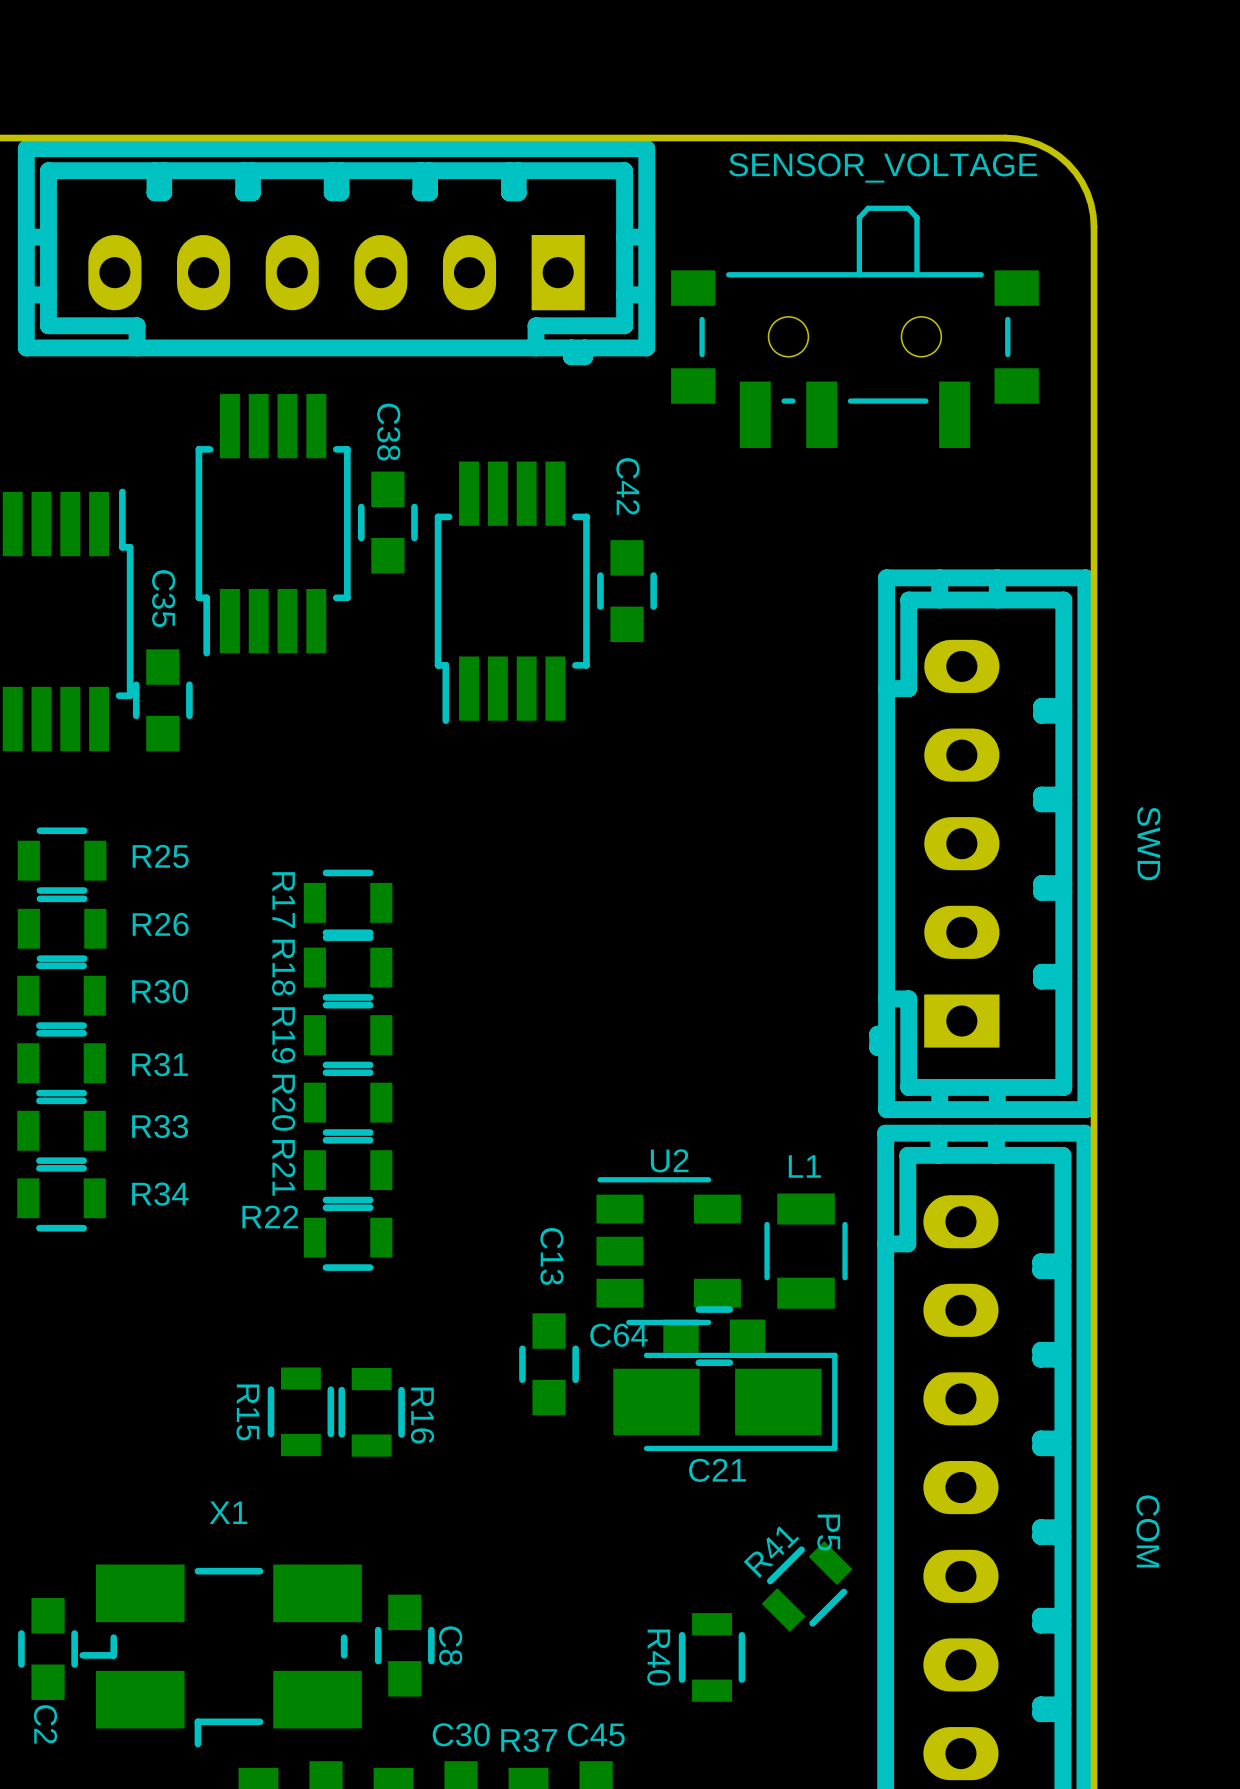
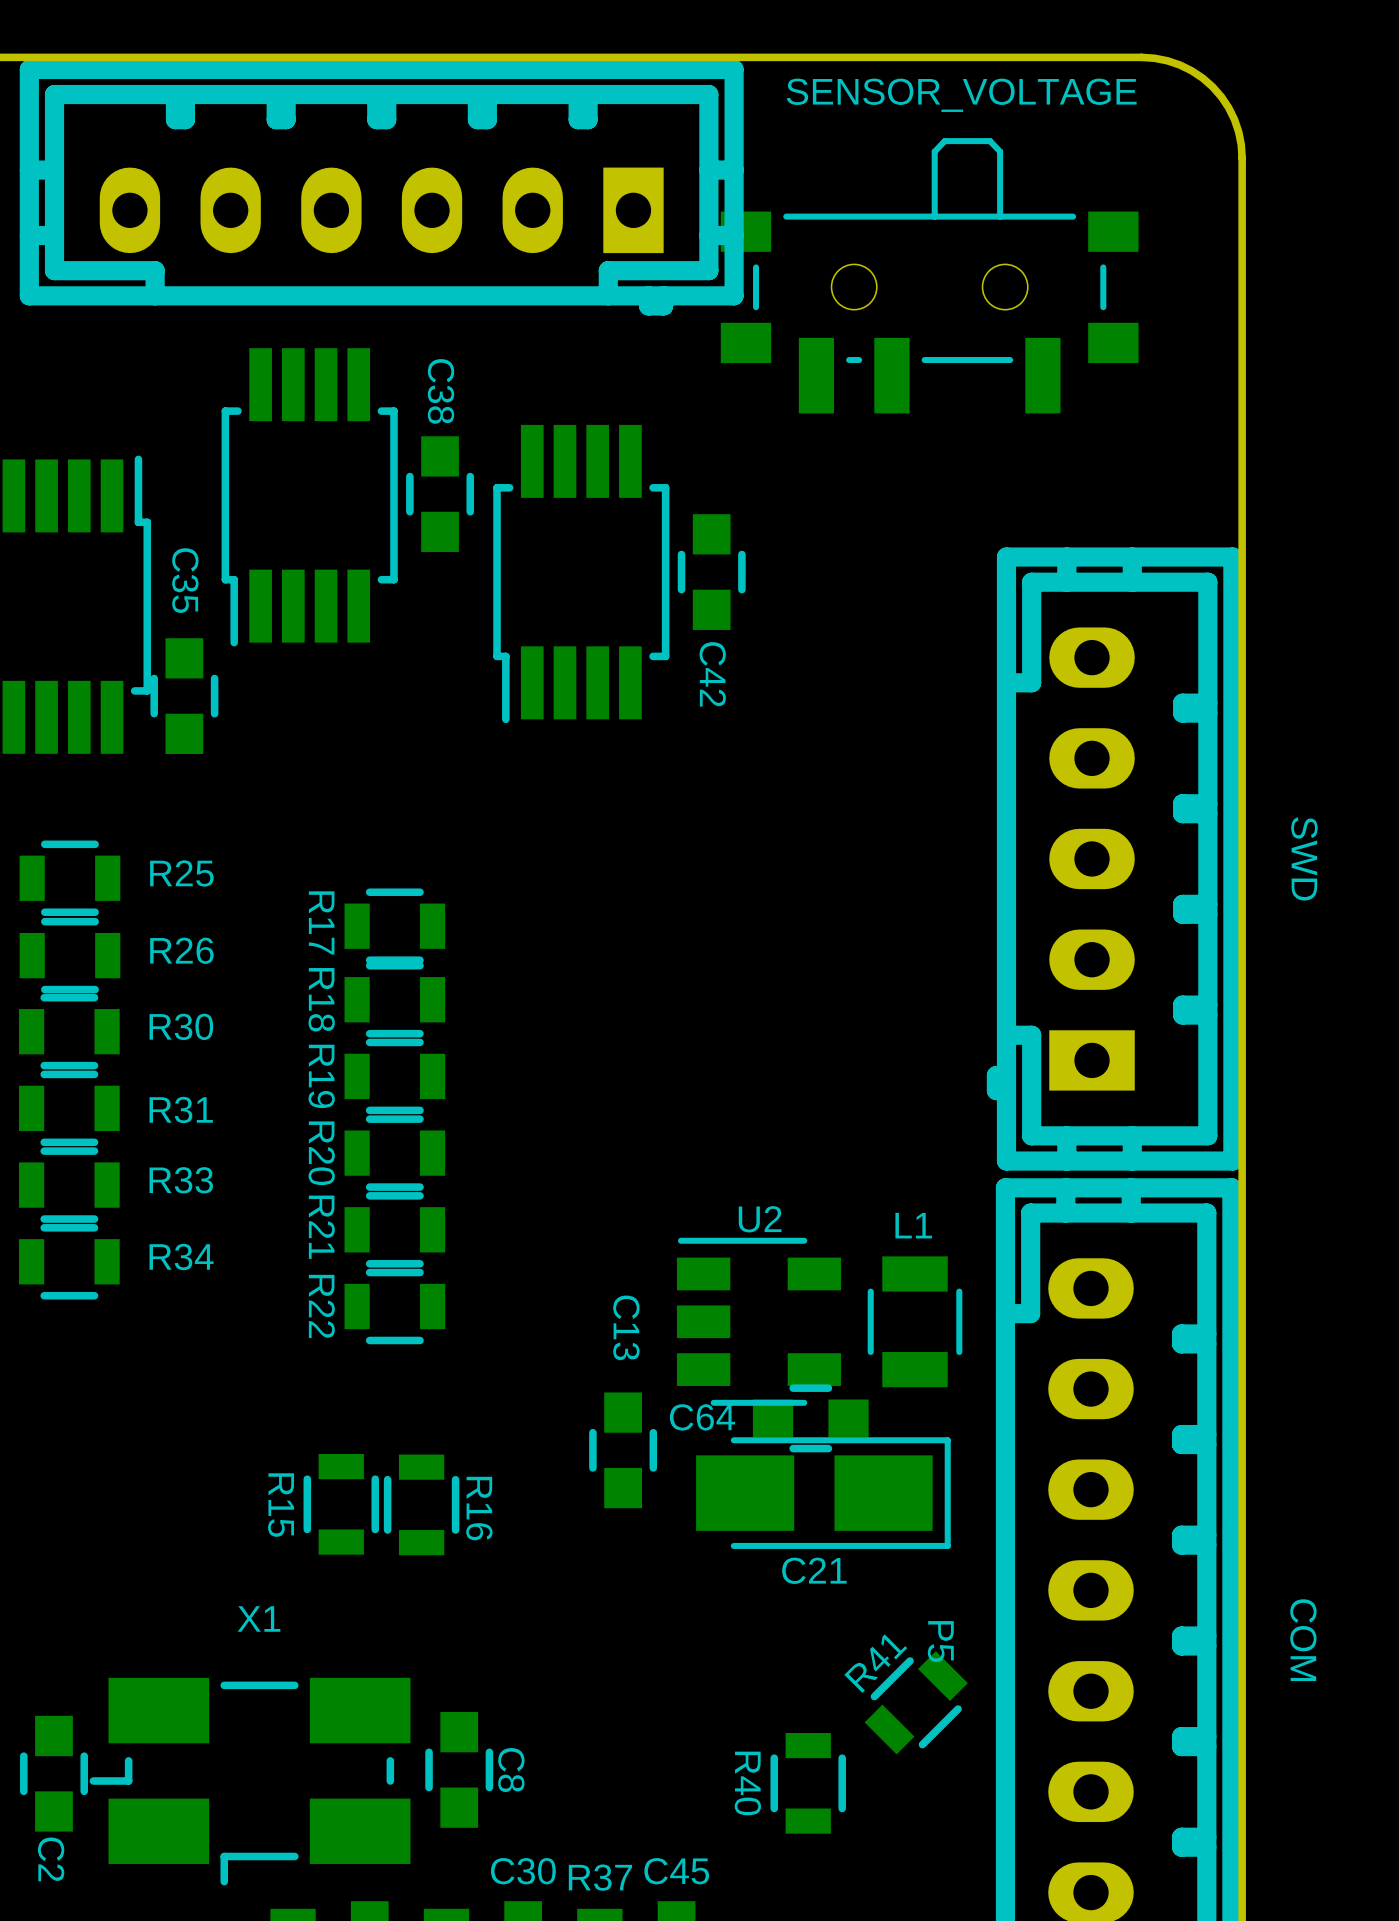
part position: (854, 326) -> (929, 275)
C42 name position: C42 (627, 486) -> C42 (712, 674)
R22 name rotation: 0° (270, 1216) -> 90° clockwise (321, 1306)

